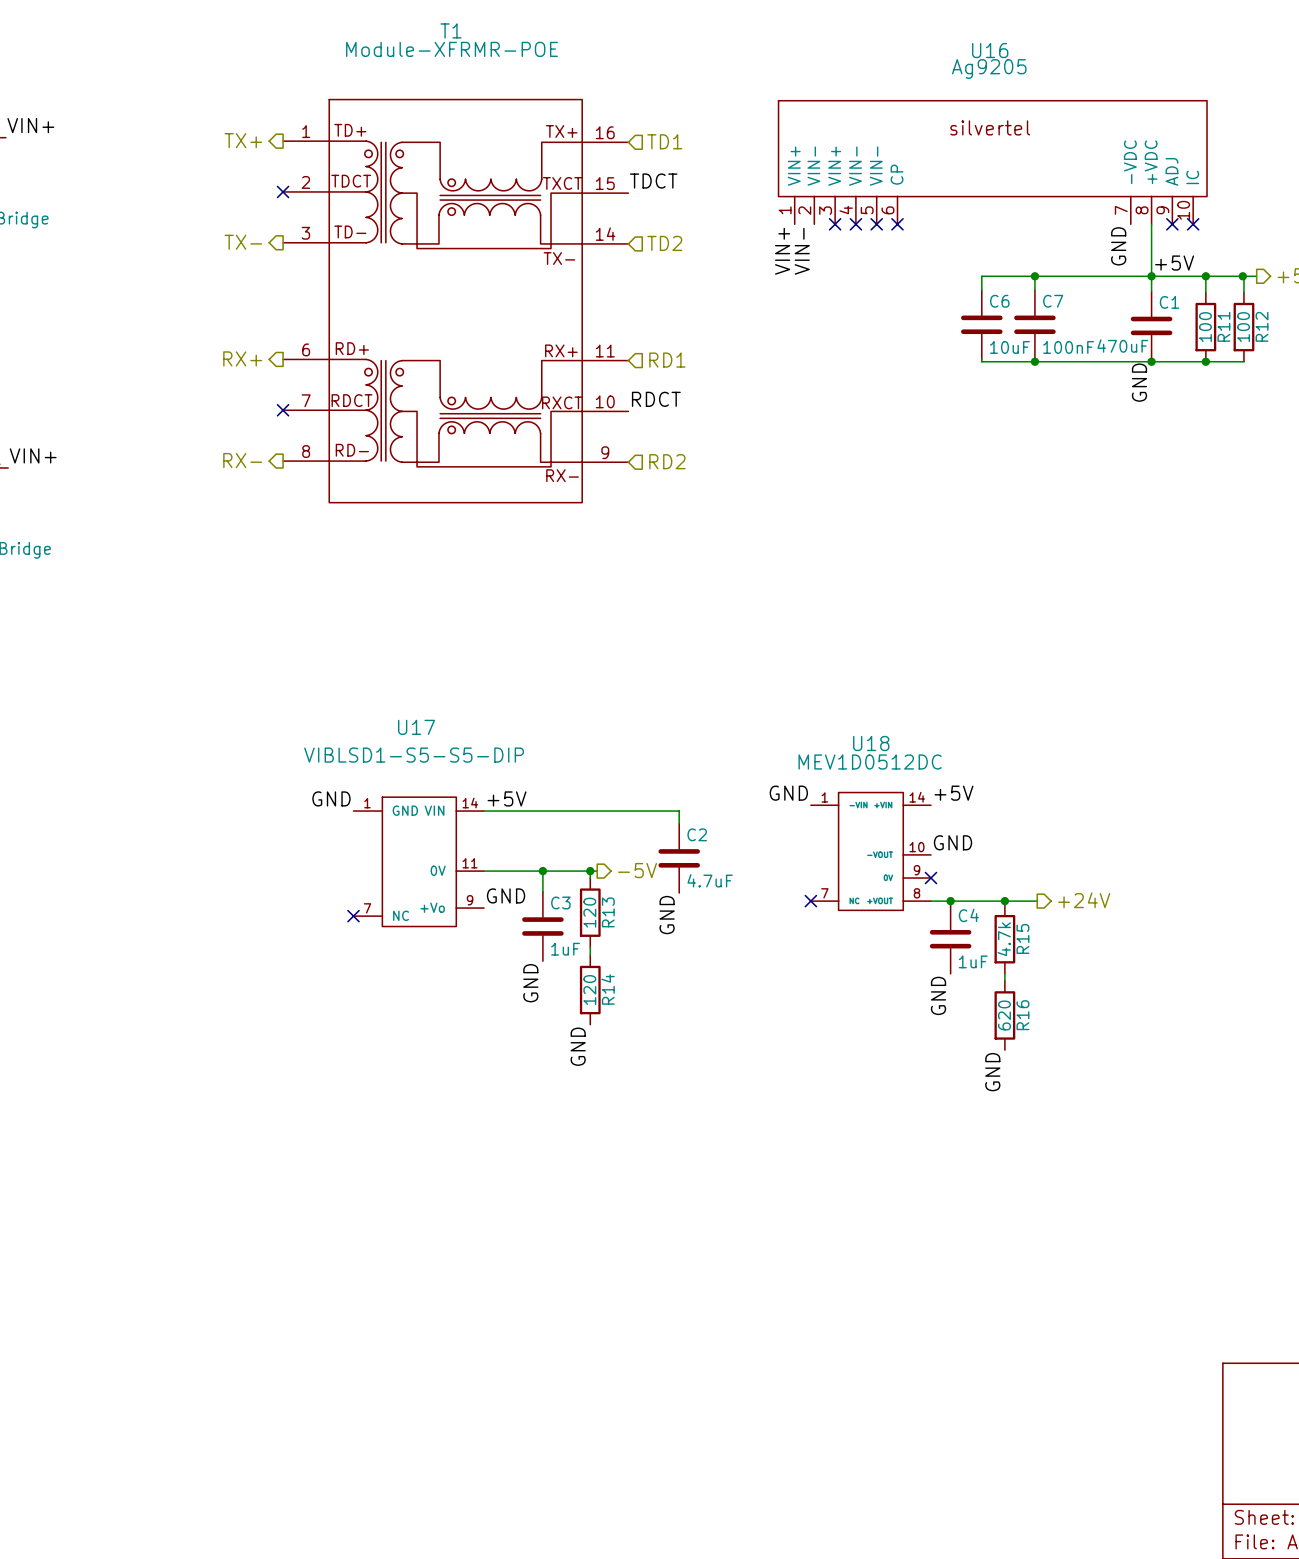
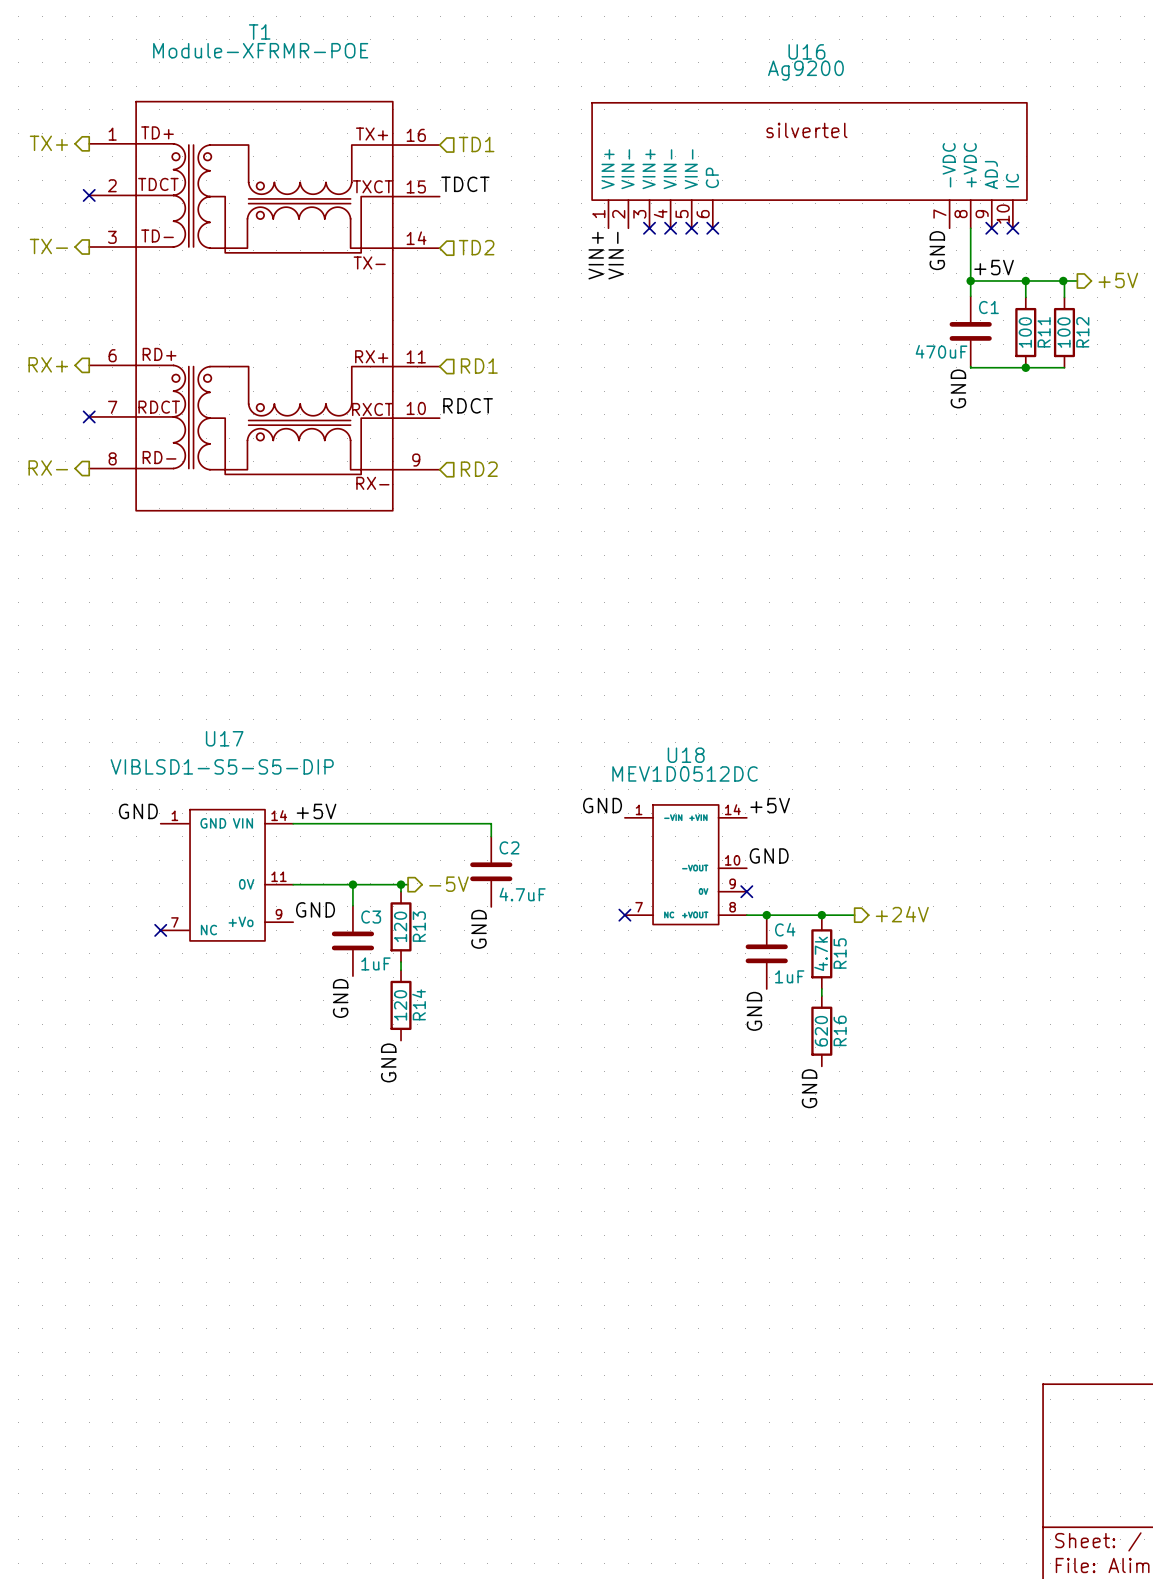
U16 value: Ag9205 (989, 69) -> Ag9200 (805, 70)
wire: (1034, 276) (1034, 290) -> none
junction: (1034, 276) -> none
wire: (1151, 276) (981, 276) (981, 290) -> none
C6: 10uF (981, 324) -> none
C7: 100nF (1034, 324) -> none
wire: (981, 359) (981, 361) (1151, 361) -> none
junction: (1034, 361) -> none
junction: (1151, 361) -> none

